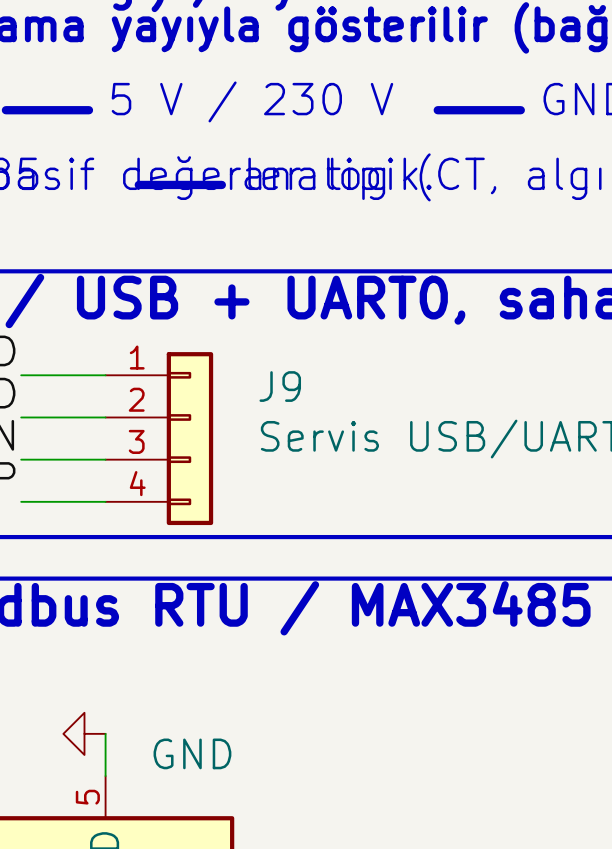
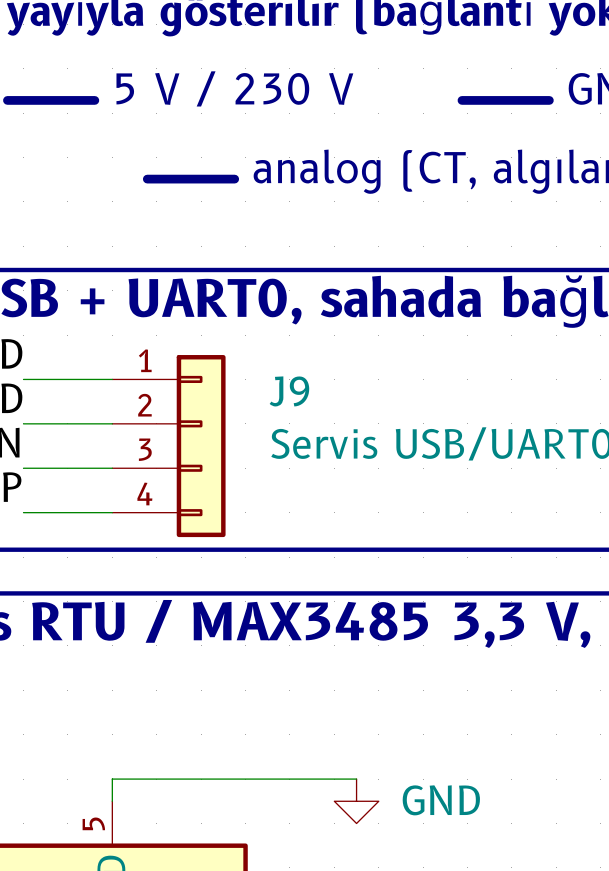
power symbol rotation: 0° (84, 733) -> 90° counterclockwise (356, 801)
power symbol position: GND (84, 733) -> GND (356, 801)
wire: (105, 733) (105, 754) -> (356, 779) (112, 779)

